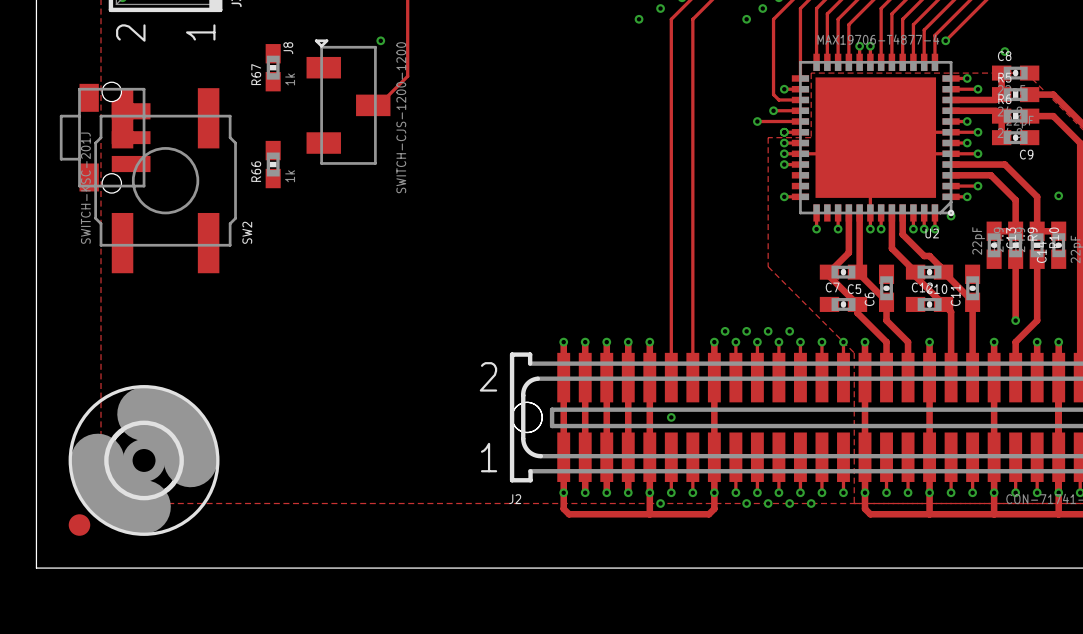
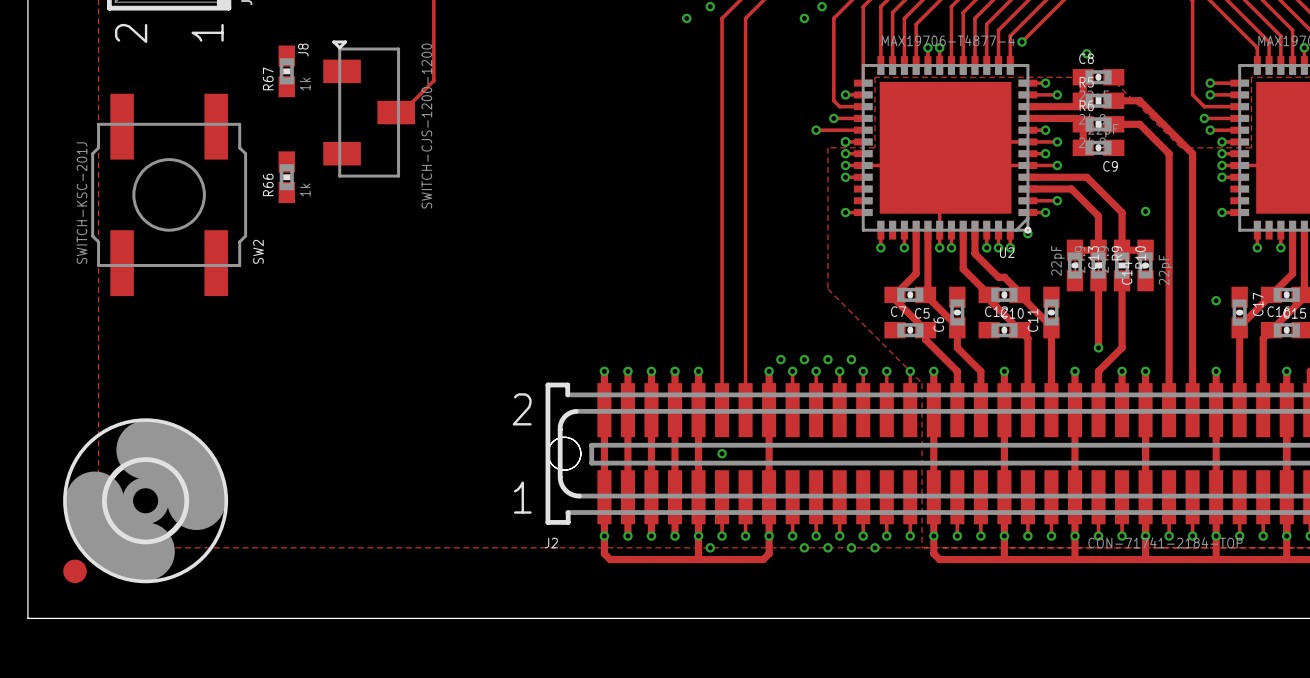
via: (380, 40) -> none
part: (105, 137) -> none

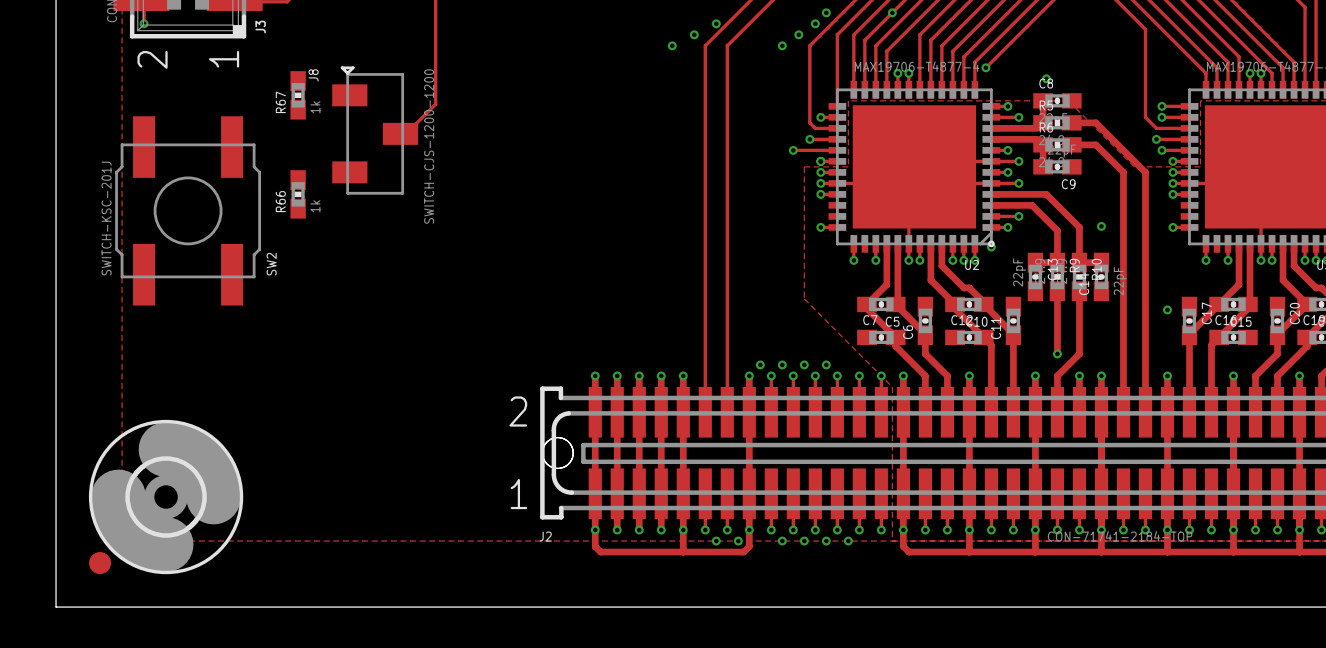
via: (722, 453) -> none
via: (710, 547) -> none
via: none -> (716, 541)
via: none -> (738, 541)

